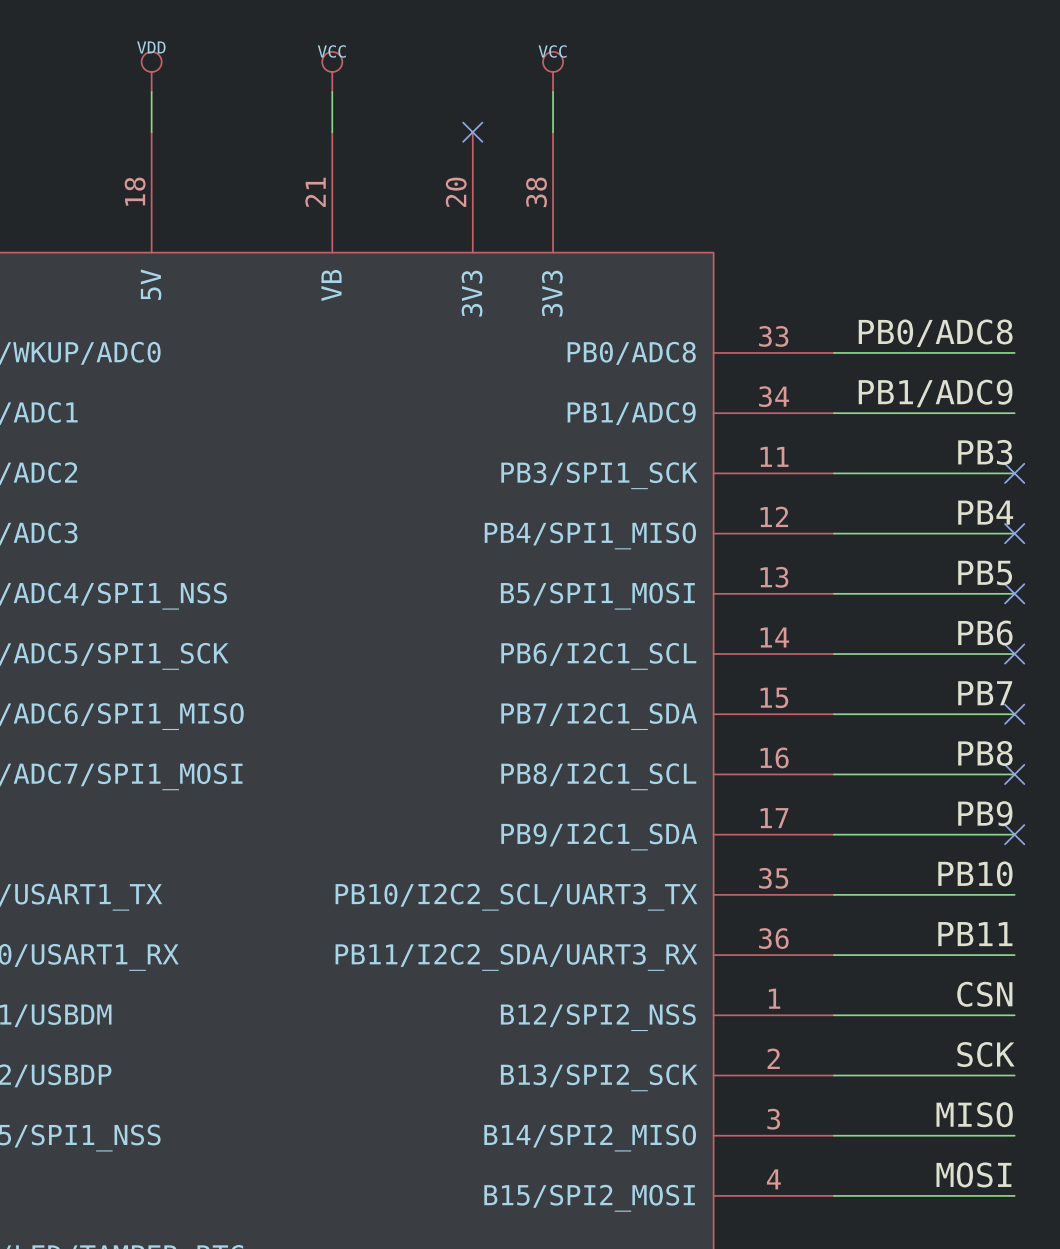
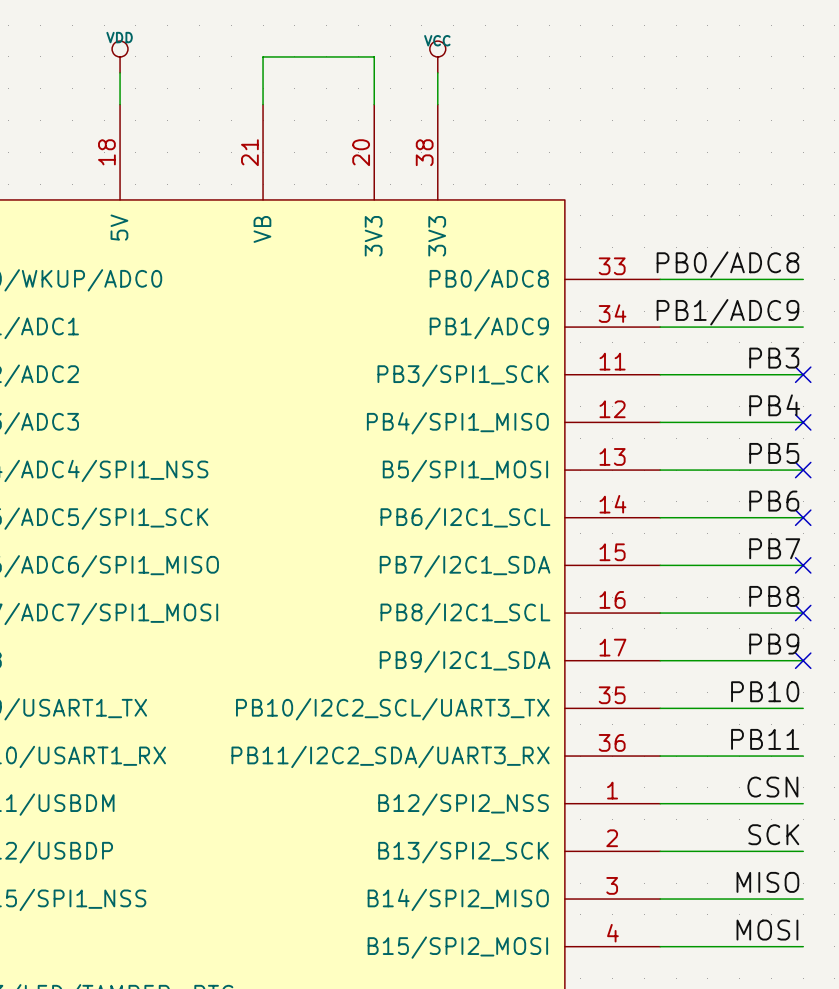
power symbol: VCC (332, 71) -> none
wire: none -> (263, 72) (263, 56) (374, 56) (374, 104)
no-connect mark: (472, 132) -> none

